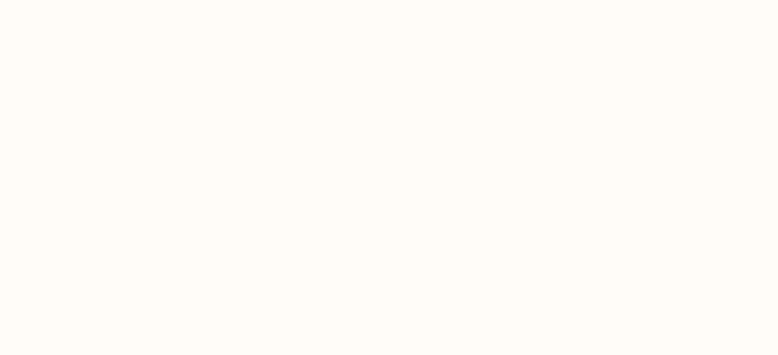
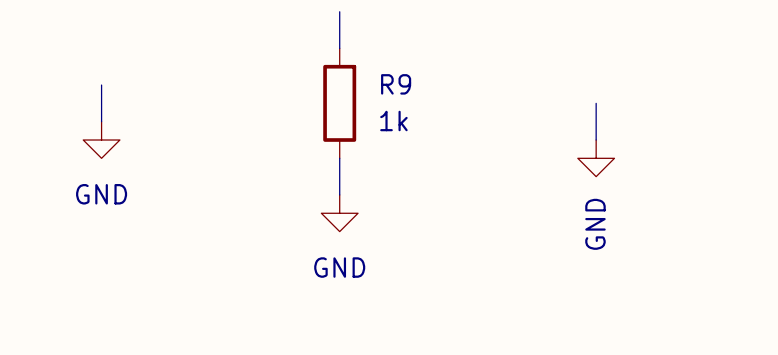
wire: none -> (339, 11) (339, 48)
wire: none -> (101, 85) (101, 121)
R9: none -> 1k (339, 103)
wire: none -> (596, 103) (596, 140)
power symbol: none -> GND (101, 140)
wire: none -> (339, 158) (339, 194)
power symbol: none -> GND (596, 158)
power symbol: none -> GND (339, 213)

